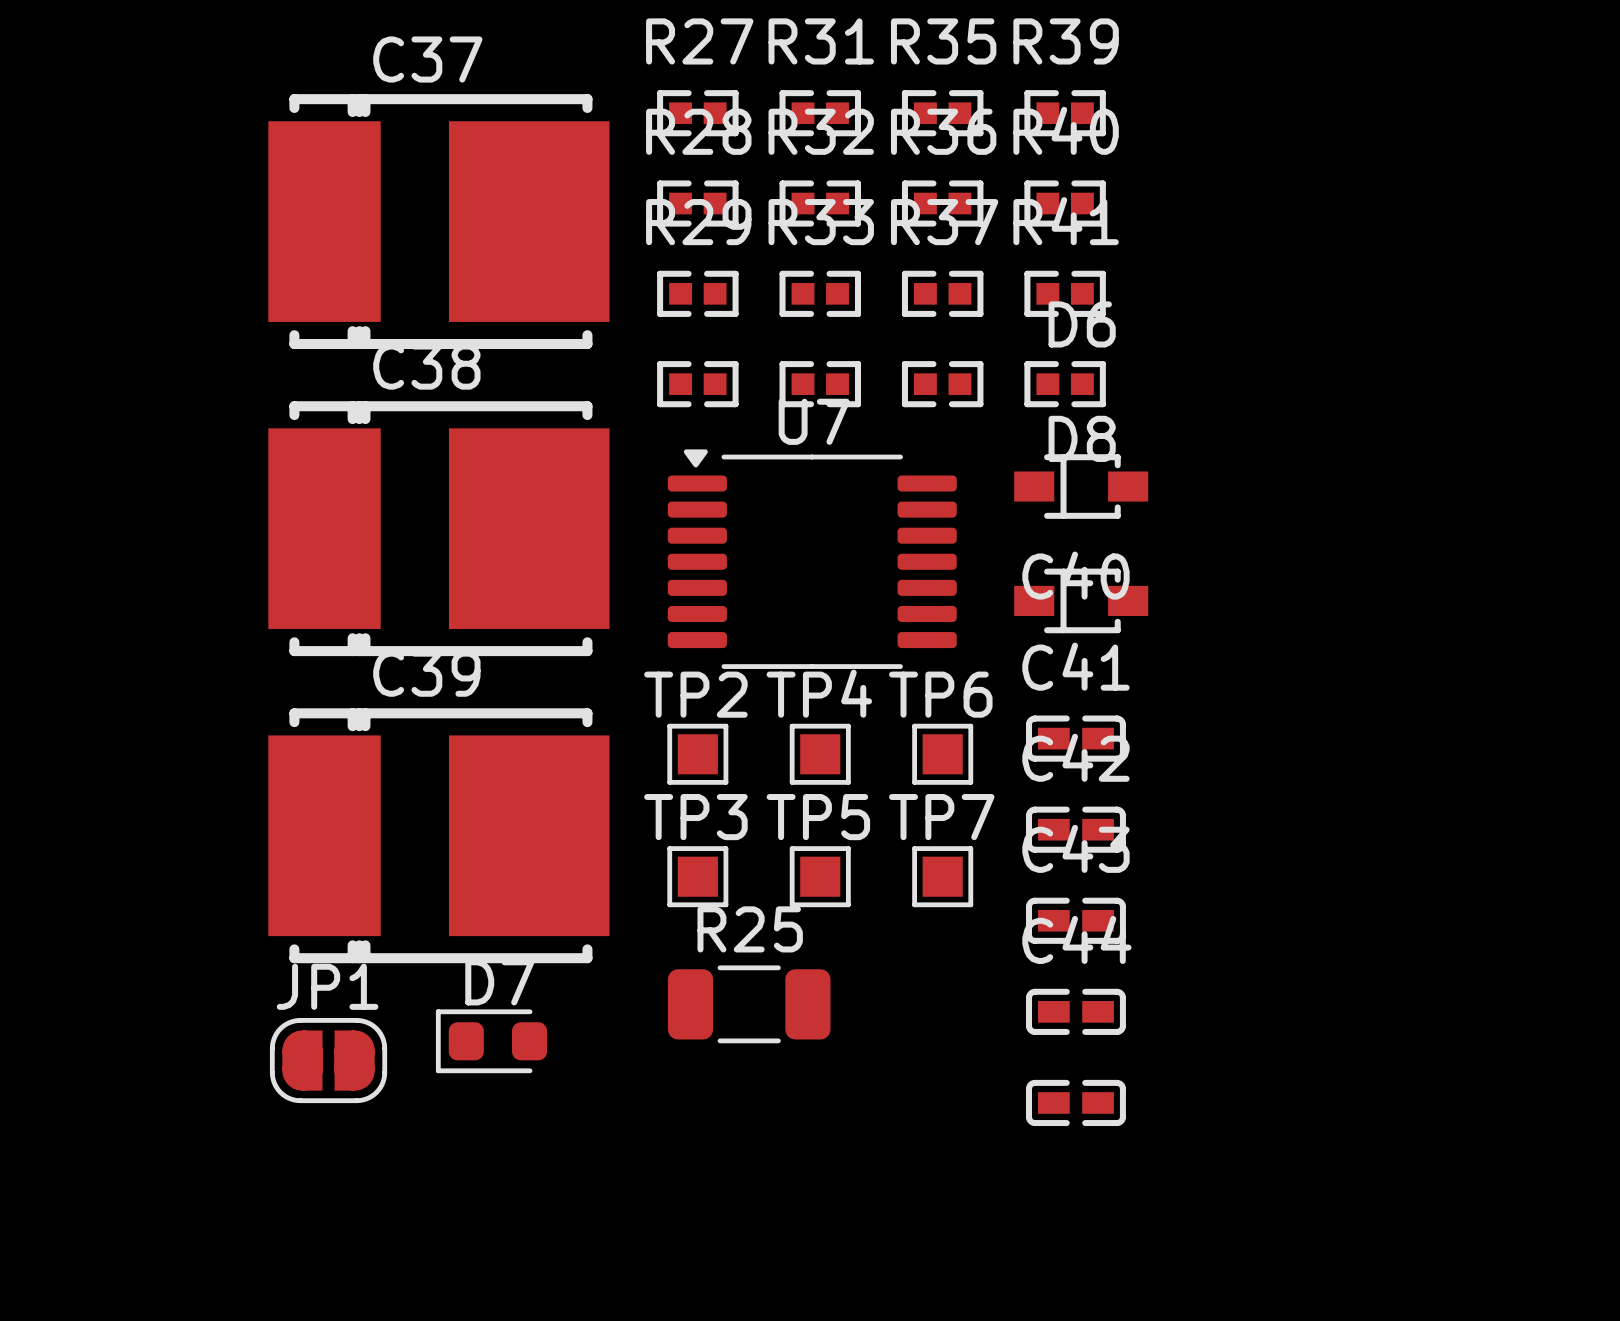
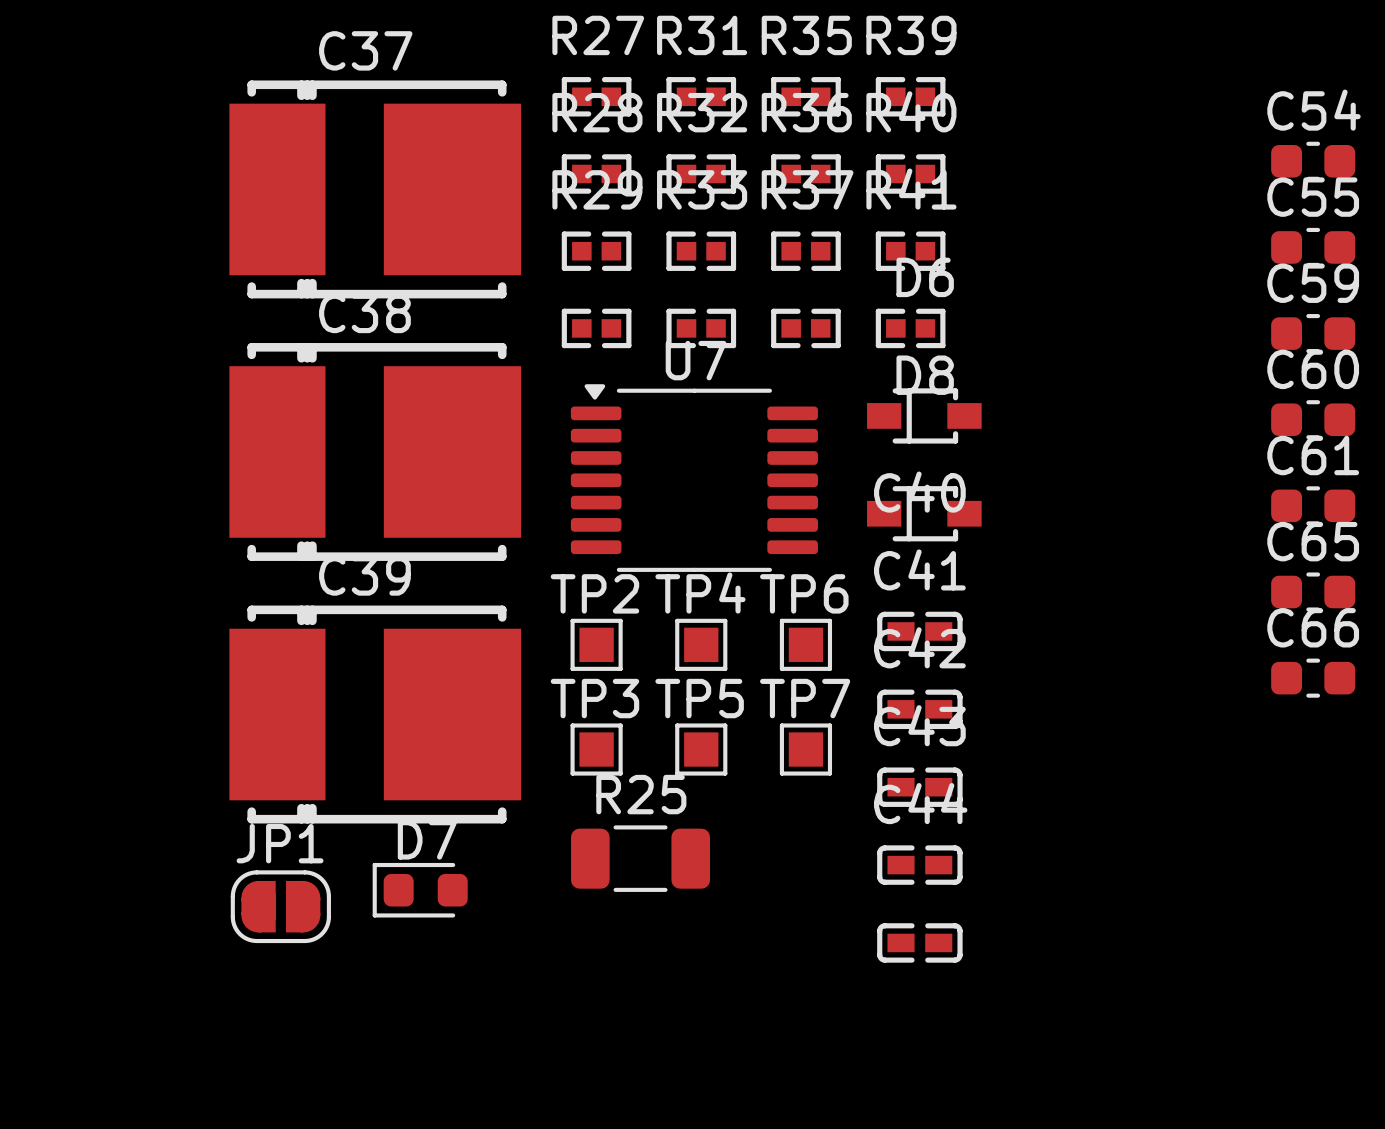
C54: none -> (1313, 161)
C55: none -> (1313, 247)
C59: none -> (1313, 333)
C60: none -> (1313, 419)
C61: none -> (1313, 505)
C65: none -> (1313, 592)
C66: none -> (1313, 678)

